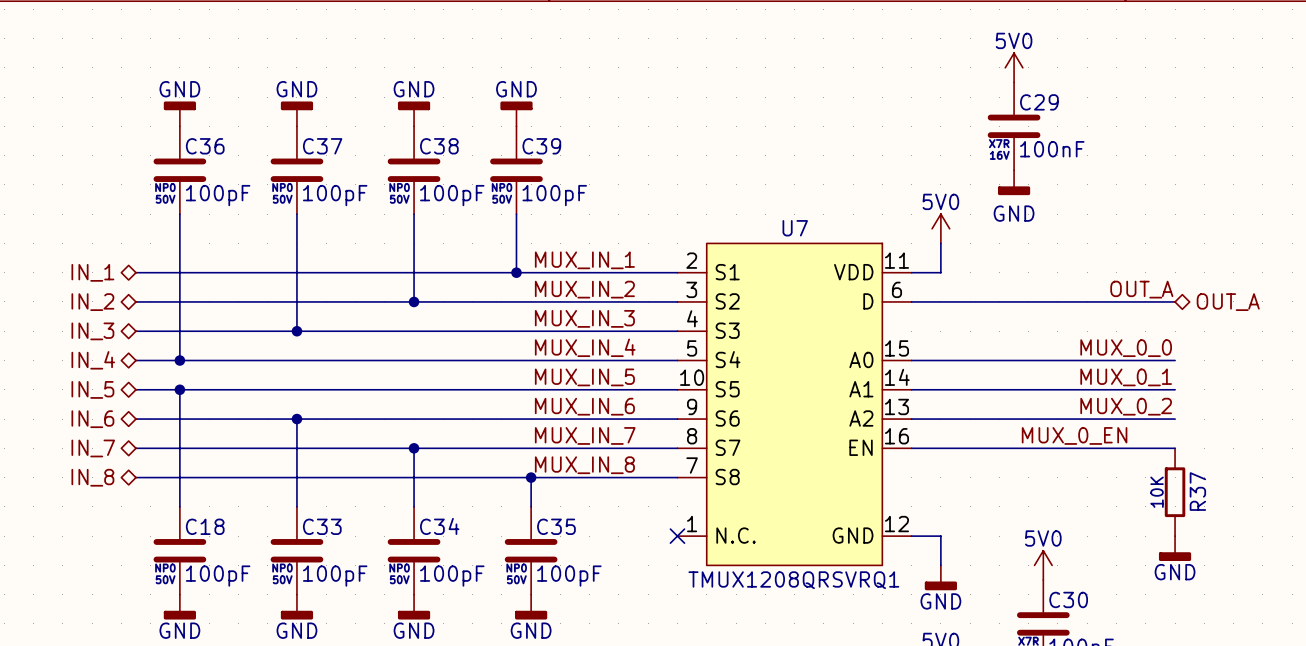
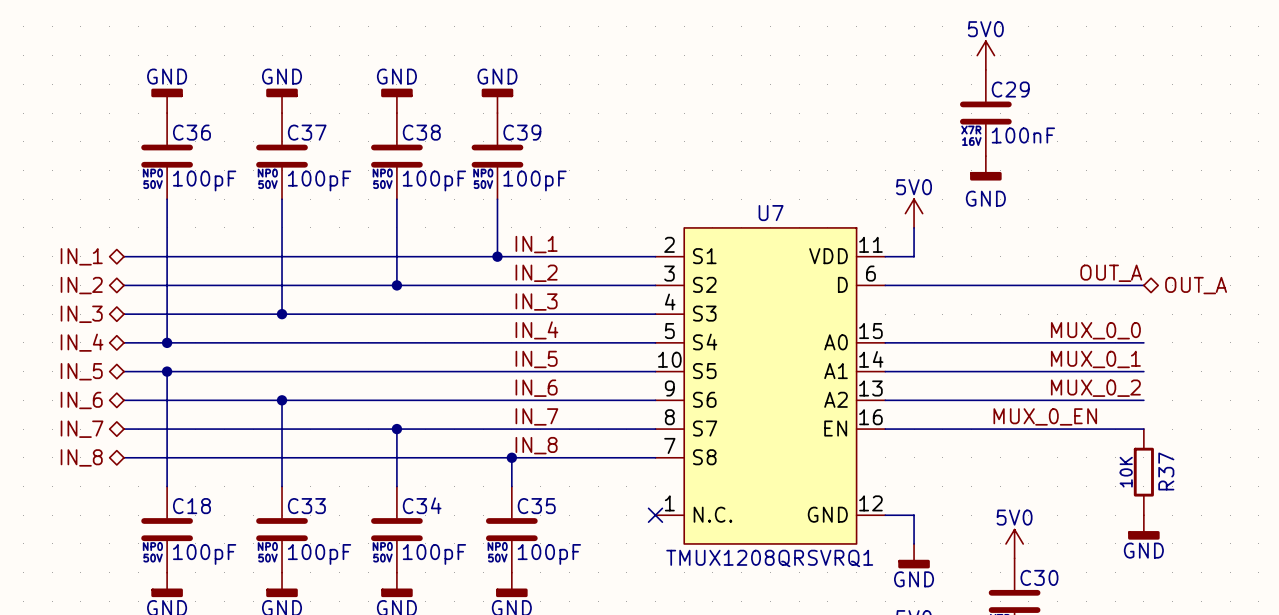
label: MUX_IN_1 (584, 260) -> IN_1 (536, 244)
label: MUX_IN_2 (584, 289) -> IN_2 (536, 273)
label: MUX_IN_3 (584, 318) -> IN_3 (536, 302)
label: MUX_IN_4 (585, 347) -> IN_4 (536, 330)
label: MUX_IN_5 (584, 377) -> IN_5 (536, 359)
label: MUX_IN_6 (584, 406) -> IN_6 (536, 388)
label: MUX_IN_7 (585, 435) -> IN_7 (536, 416)
label: MUX_IN_8 (584, 465) -> IN_8 (536, 445)

